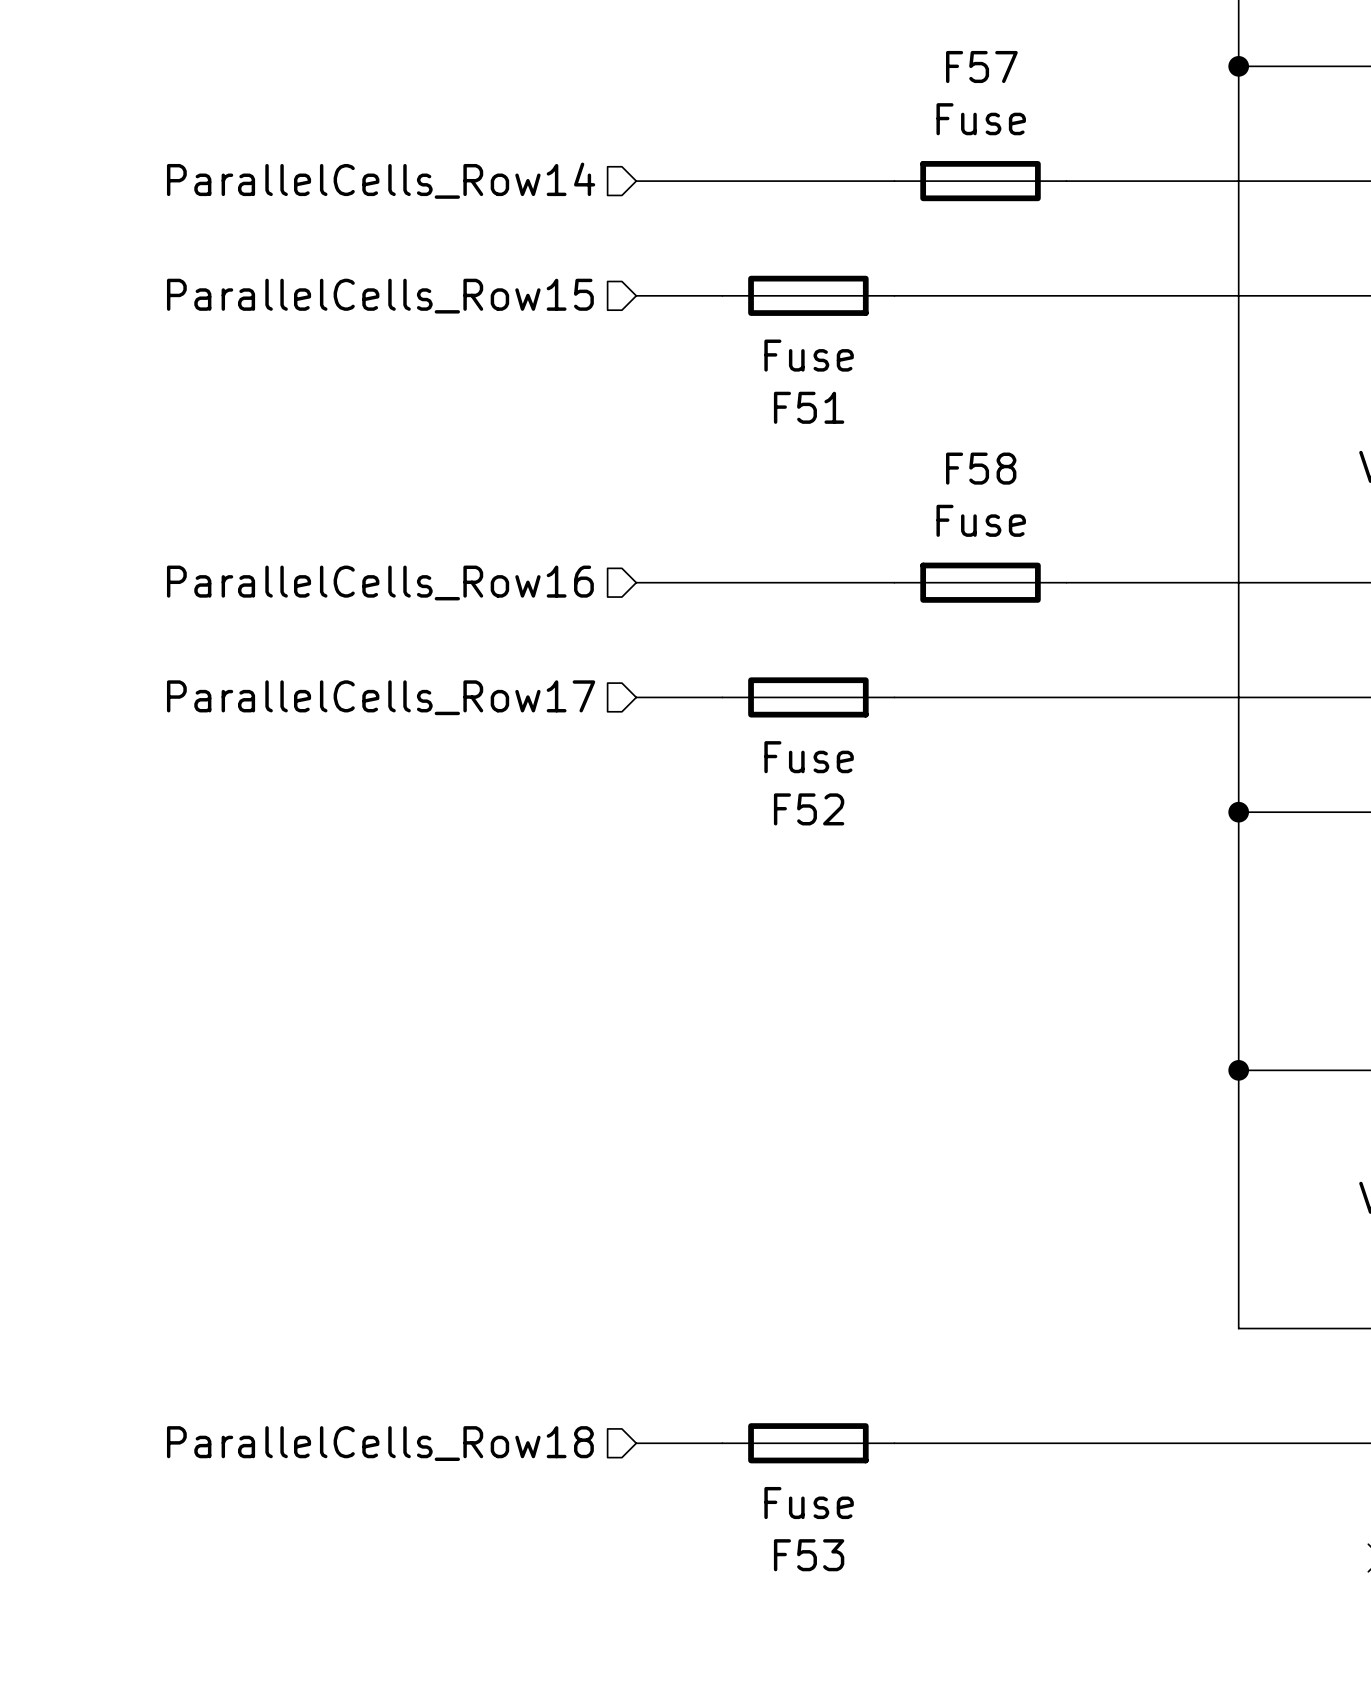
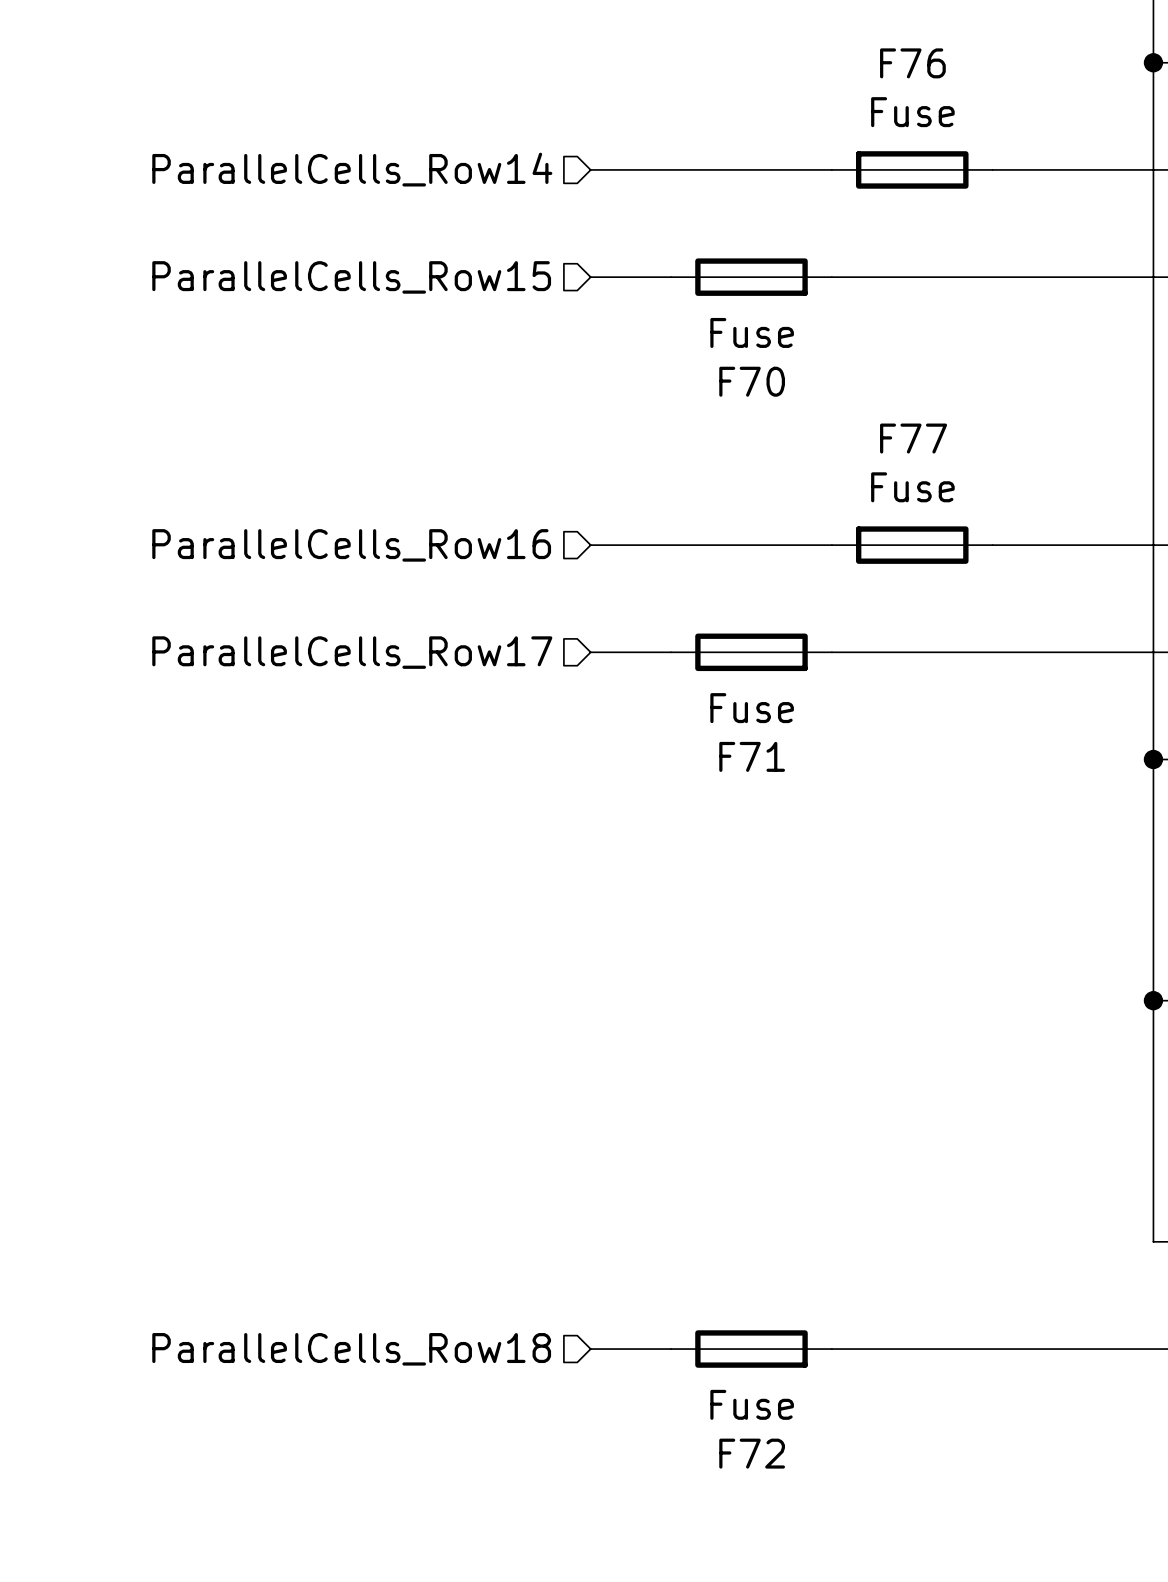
F57 name: F57 (981, 67) -> F76 (912, 63)
F51 name: F51 (809, 407) -> F70 (752, 381)
F58 name: F58 (981, 468) -> F77 (913, 438)
F52 name: F52 (809, 809) -> F71 (752, 756)
F53 name: F53 (809, 1555) -> F72 (752, 1453)

